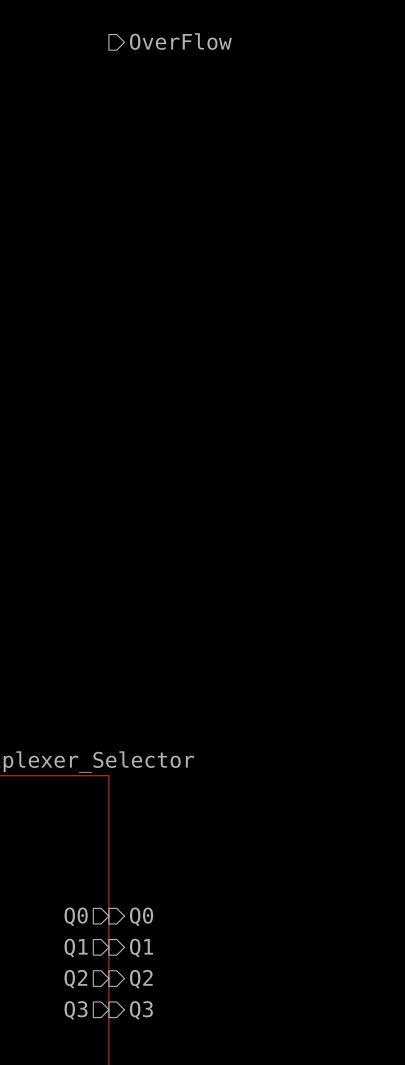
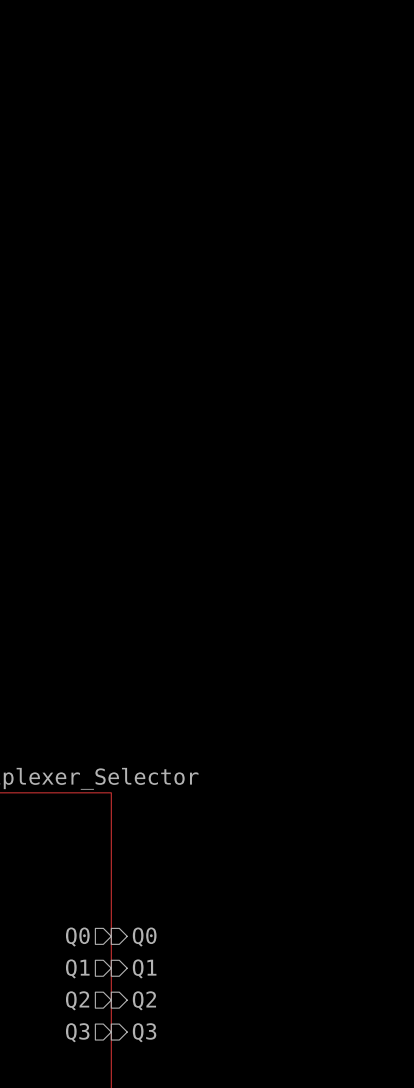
hierarchical label: OverFlow (180, 41) -> none

